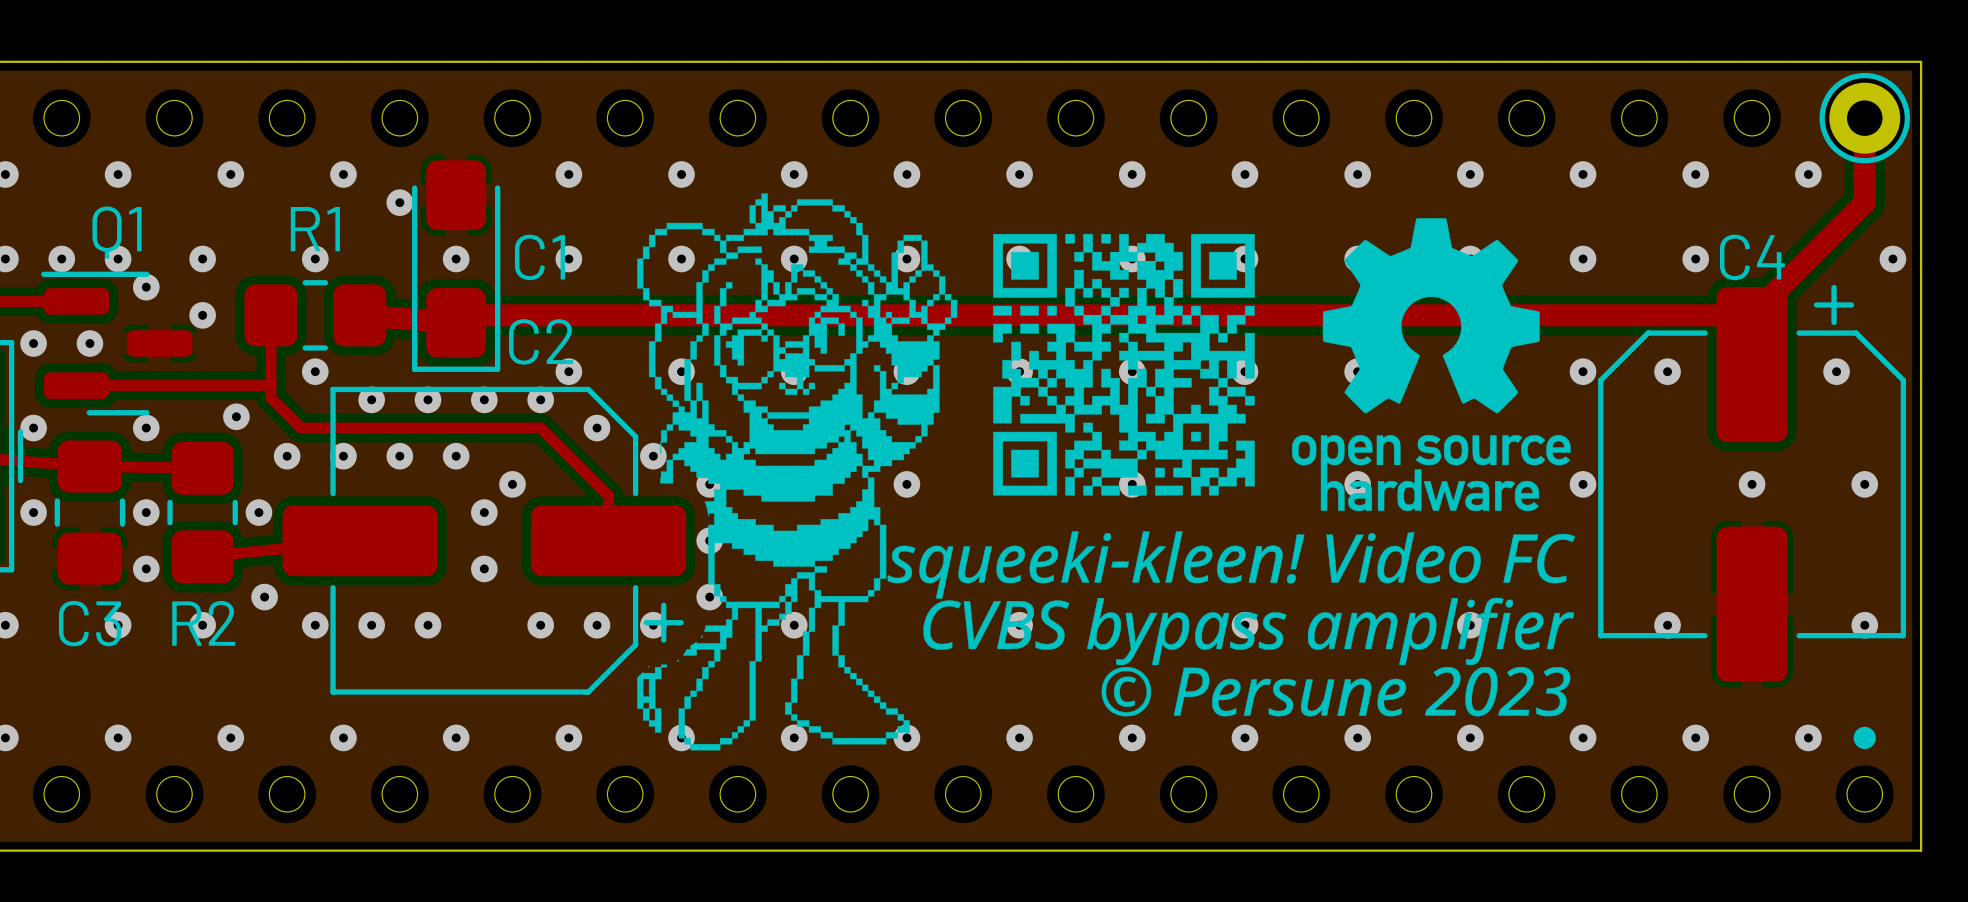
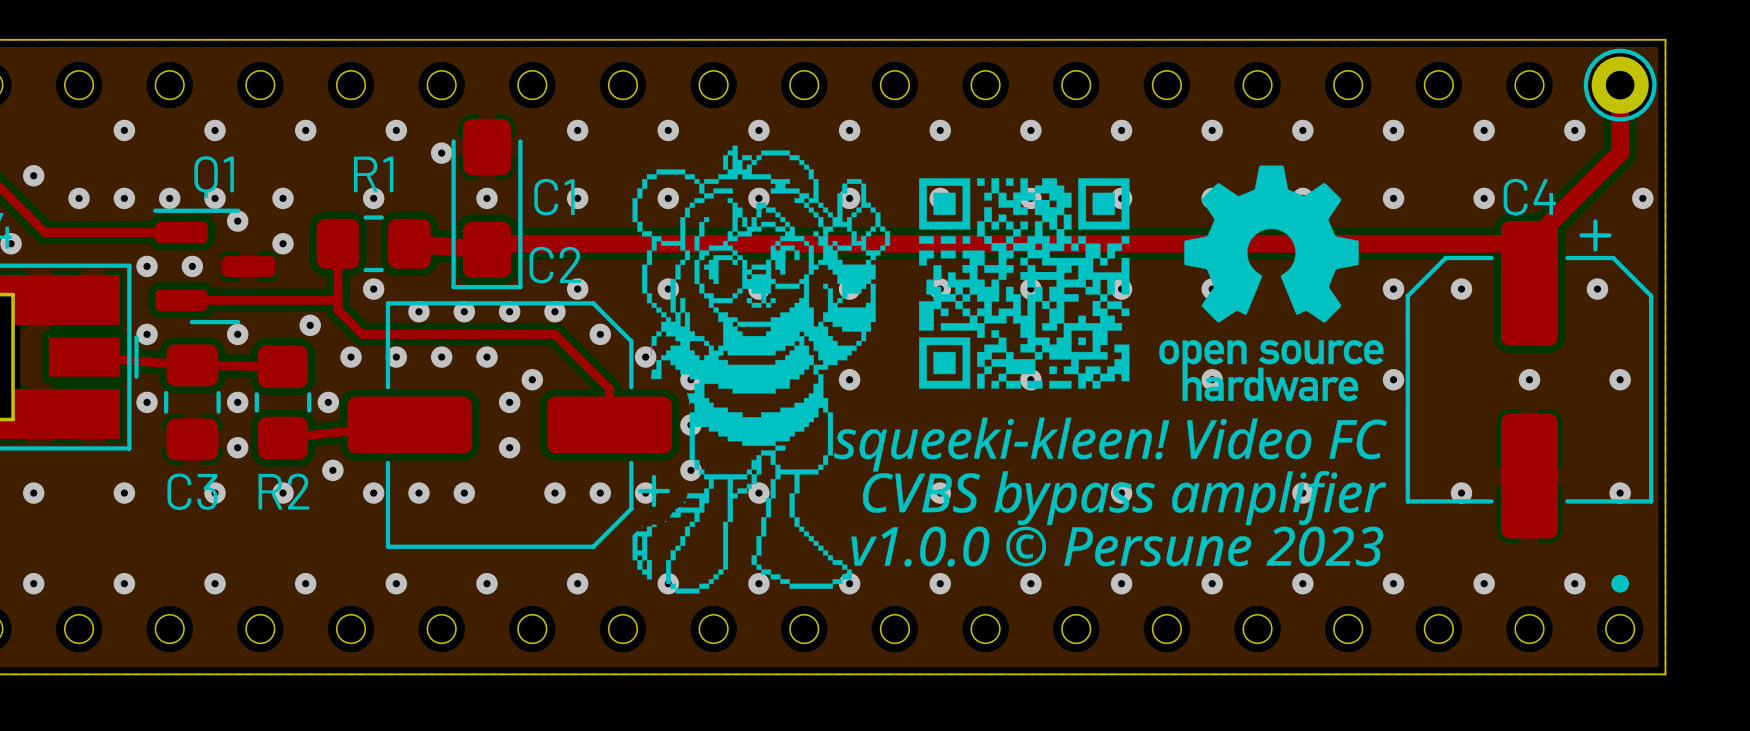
drawing shape: [637, 193, 1576, 751] -> [632, 145, 1388, 594]

